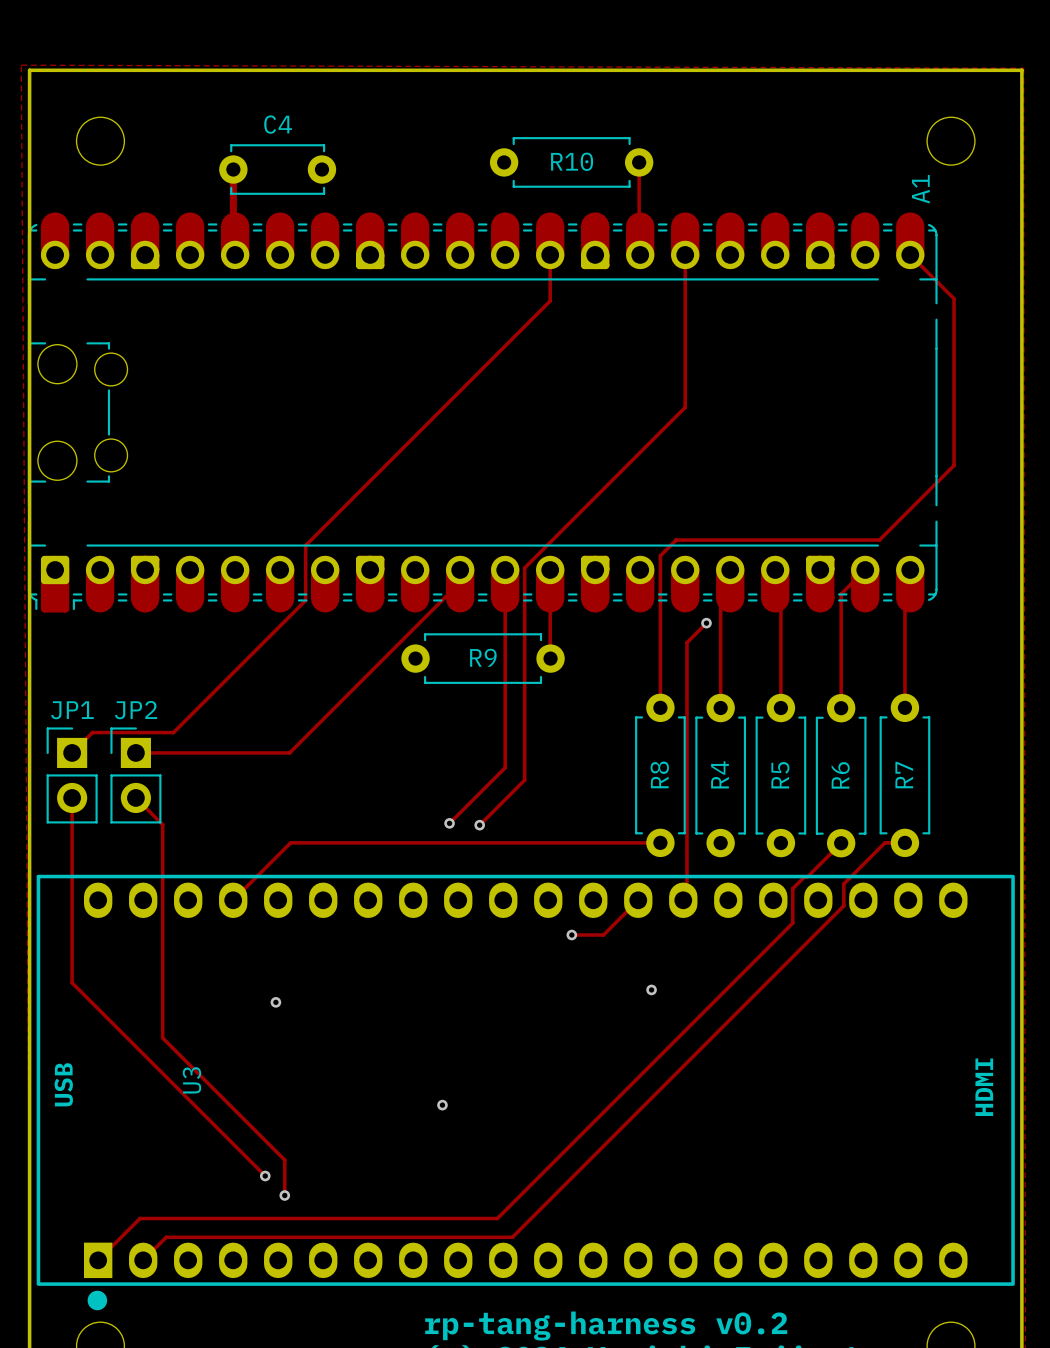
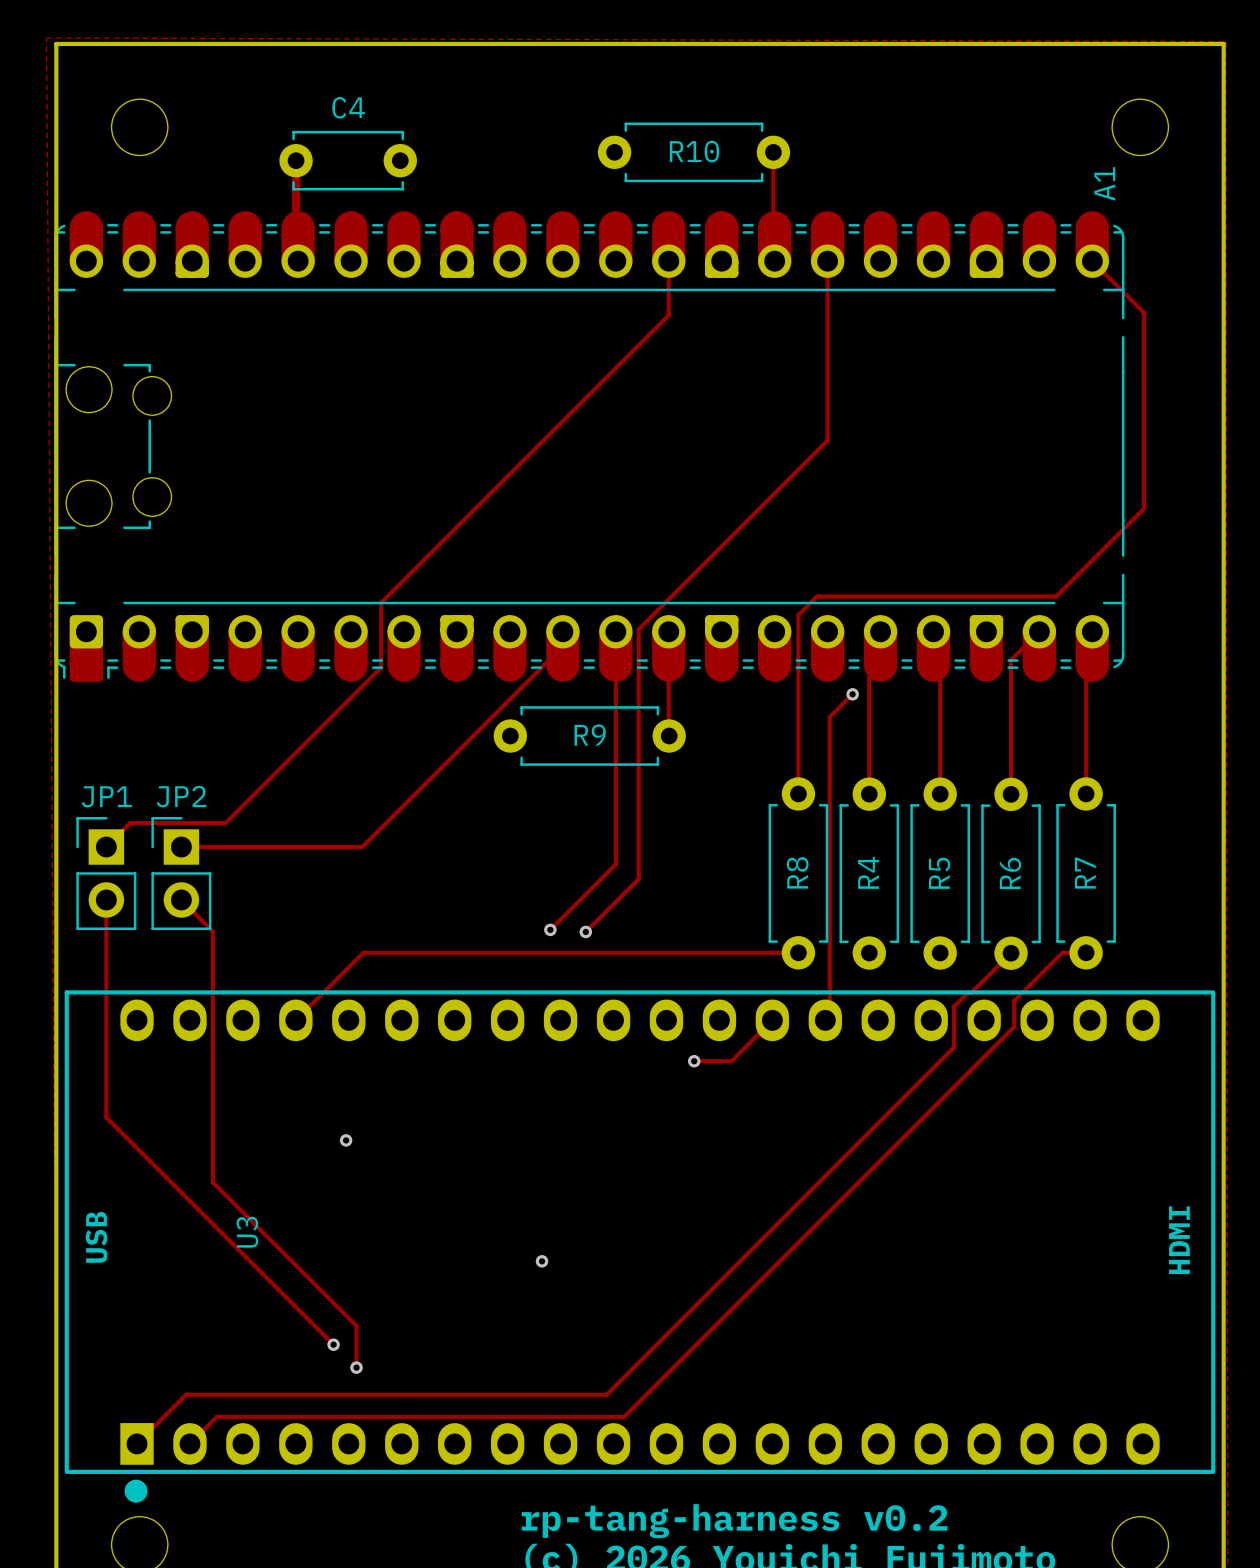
via: (651, 989) -> none

